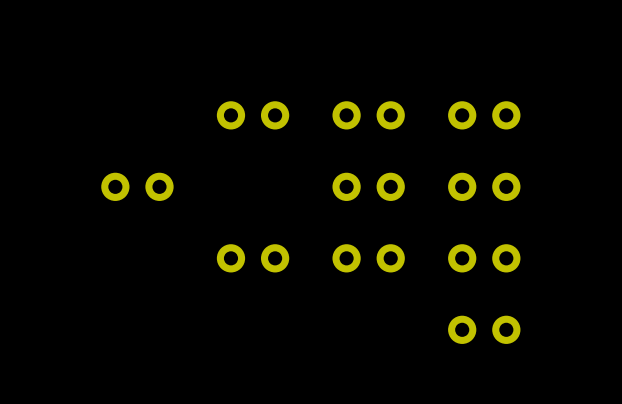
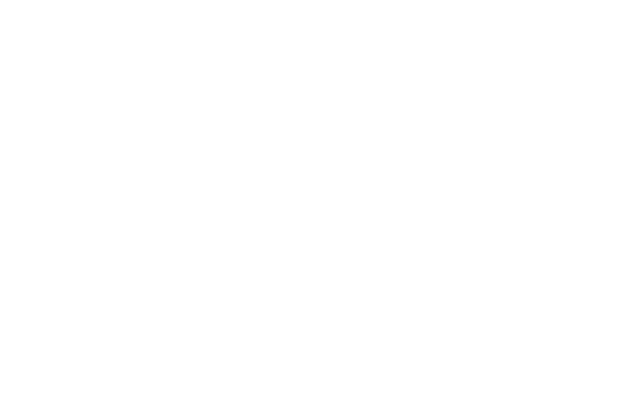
part: (253, 115) -> none
part: (368, 115) -> none
part: (484, 115) -> none
part: (137, 186) -> none
part: (368, 186) -> none
part: (484, 186) -> none
part: (253, 258) -> none
part: (368, 258) -> none
part: (484, 258) -> none
part: (484, 329) -> none

